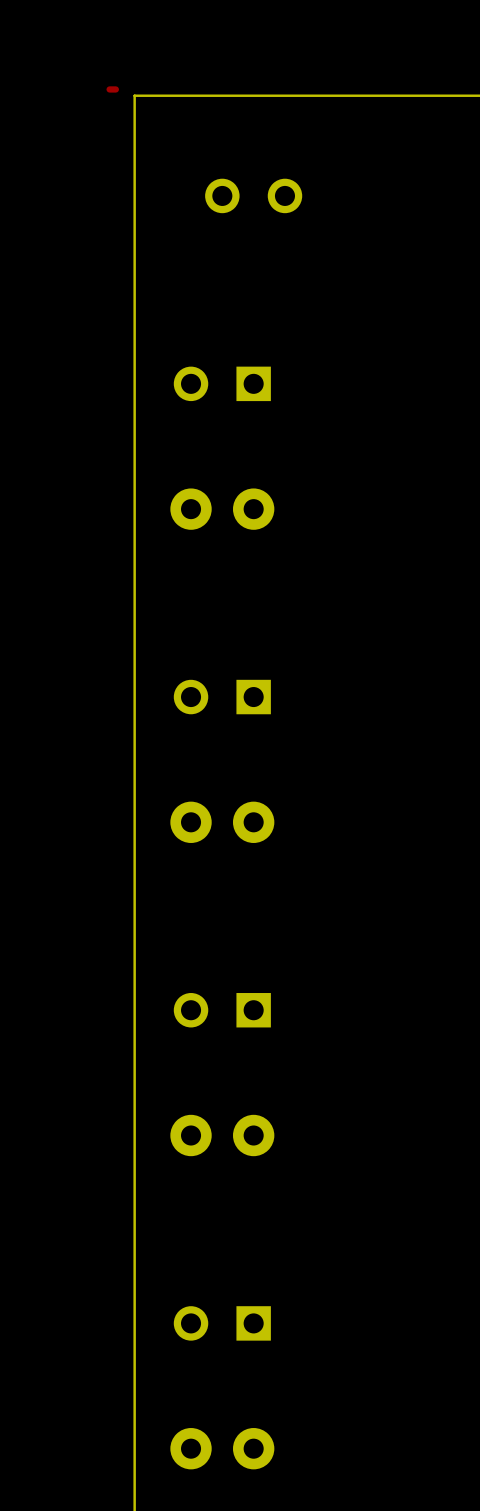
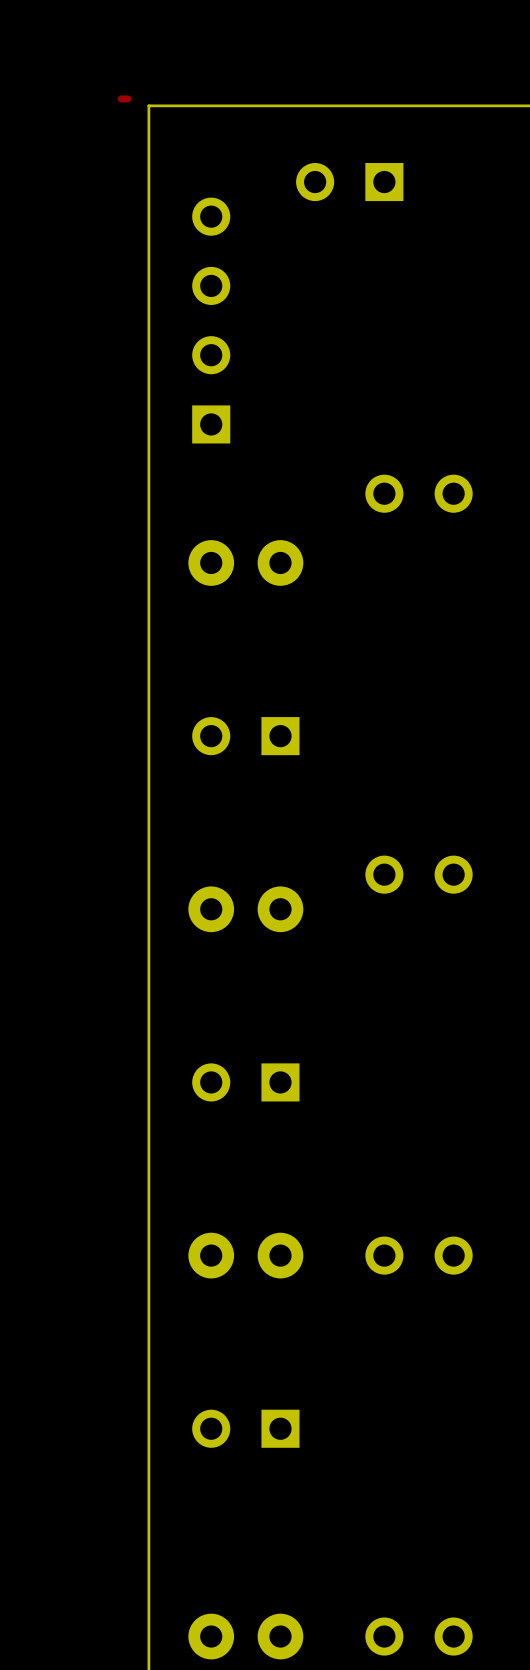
part: none -> (349, 182)
part position: (253, 195) -> (419, 493)
part: none -> (211, 320)
part: (222, 383) -> none
part position: (222, 697) -> (245, 736)
part: none -> (419, 874)
part position: (222, 1010) -> (245, 1082)
part: none -> (419, 1255)
part position: (222, 1323) -> (245, 1428)
part position: (222, 1448) -> (245, 1636)
part: none -> (419, 1636)

